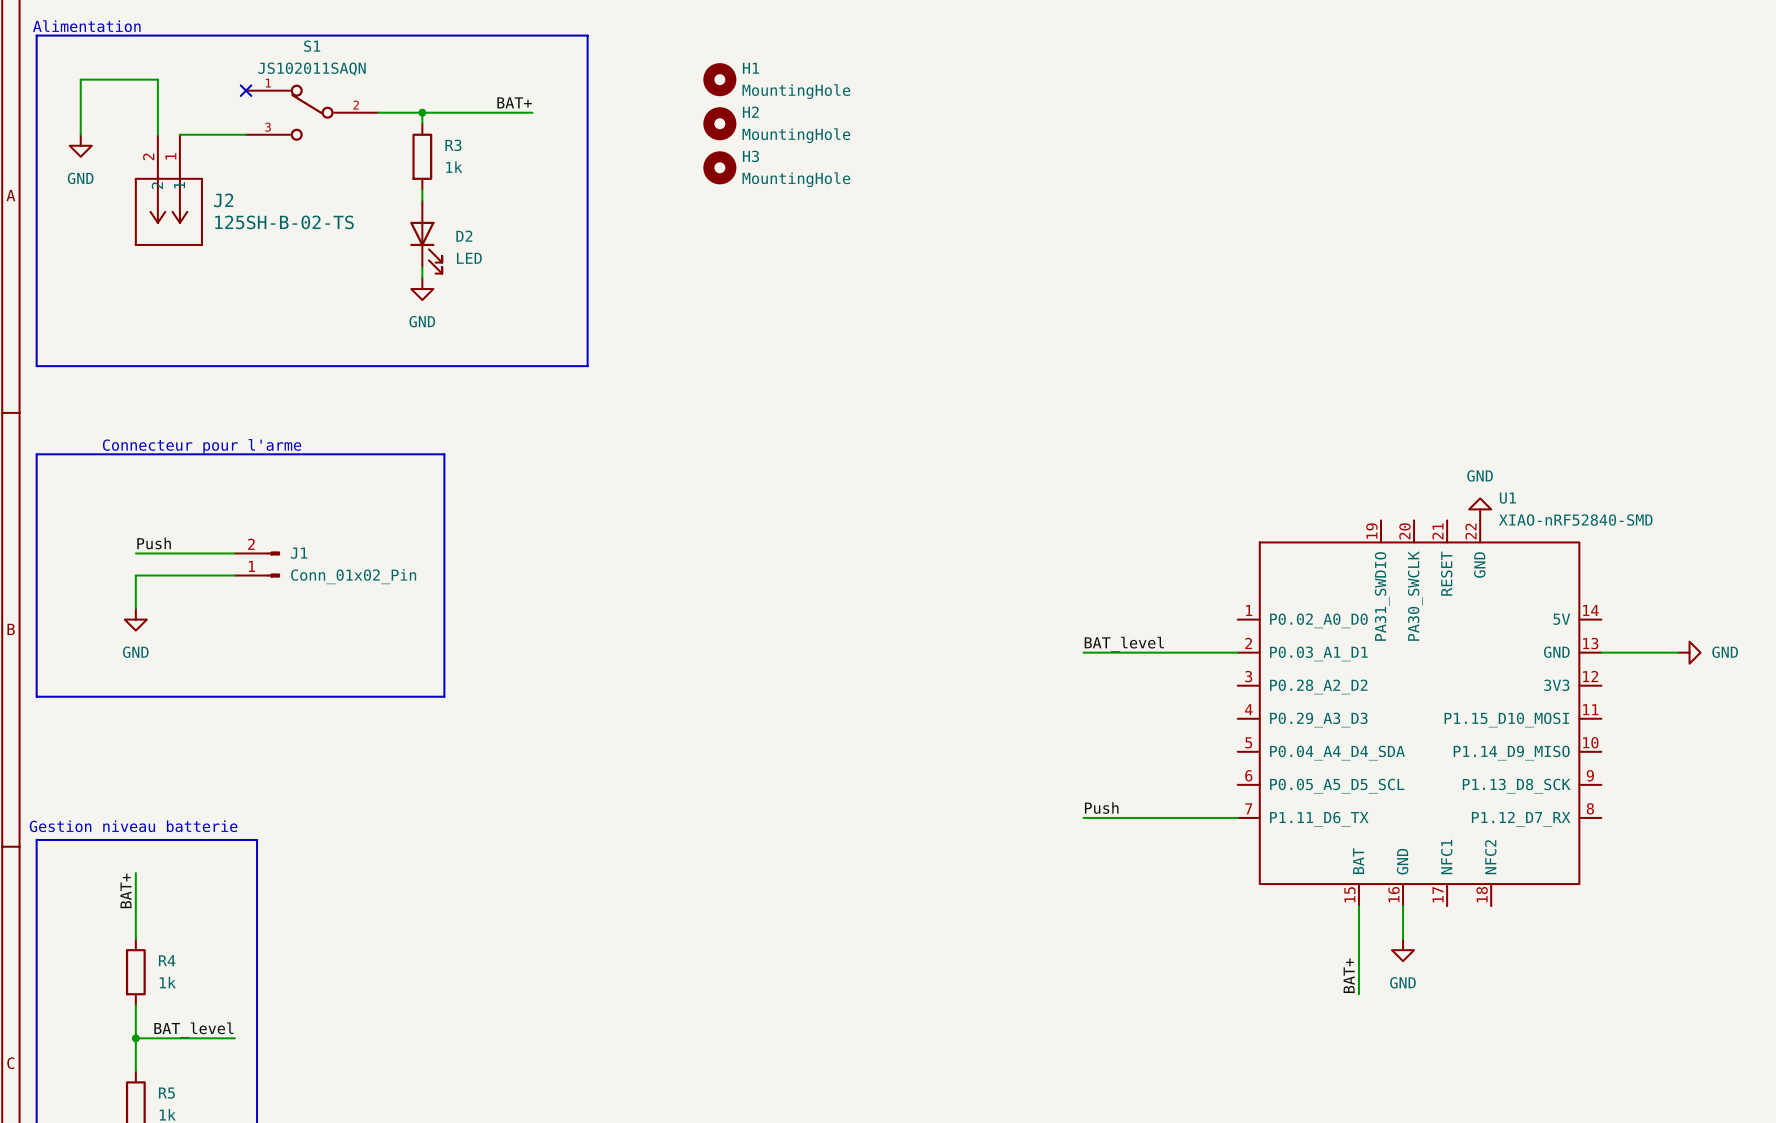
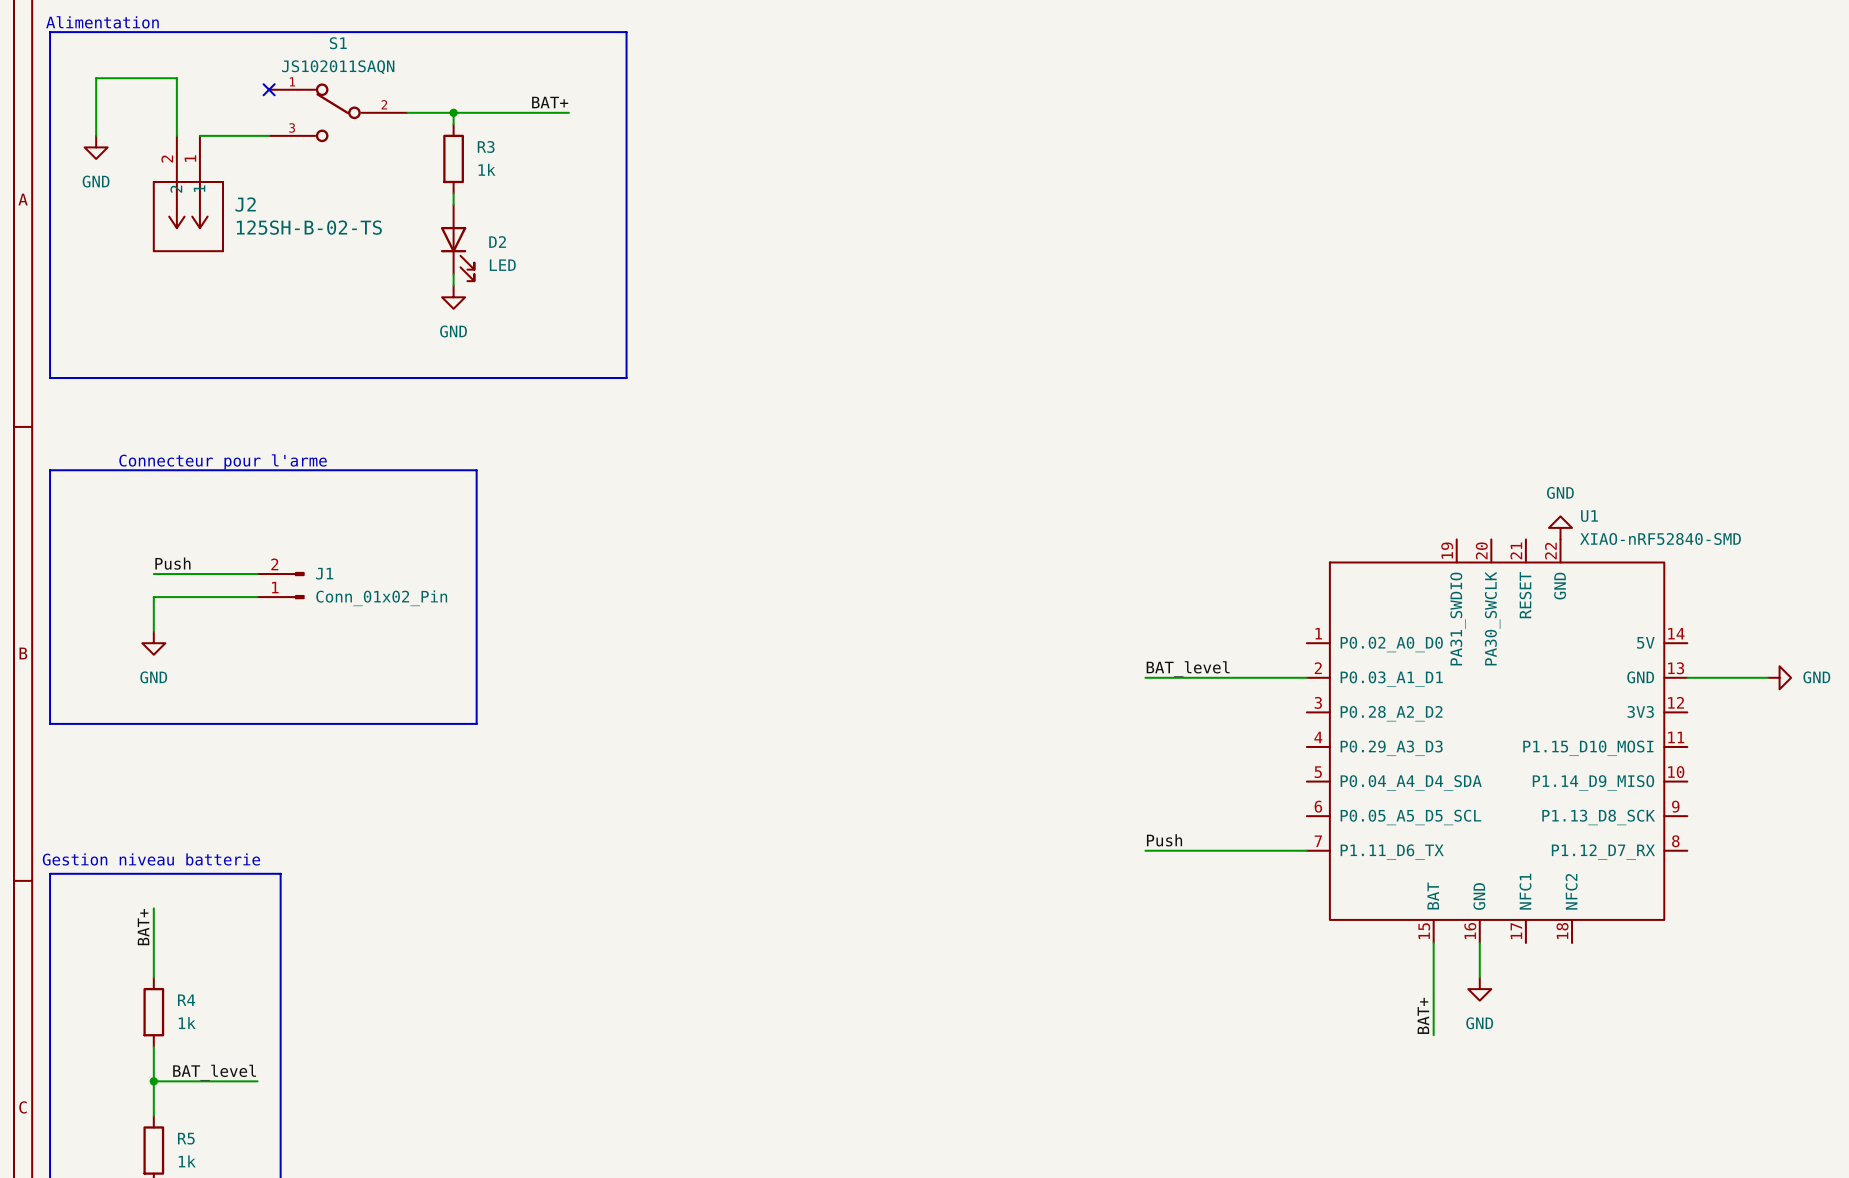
H1: MountingHole (719, 79) -> none
H2: MountingHole (719, 123) -> none
H3: MountingHole (719, 167) -> none

